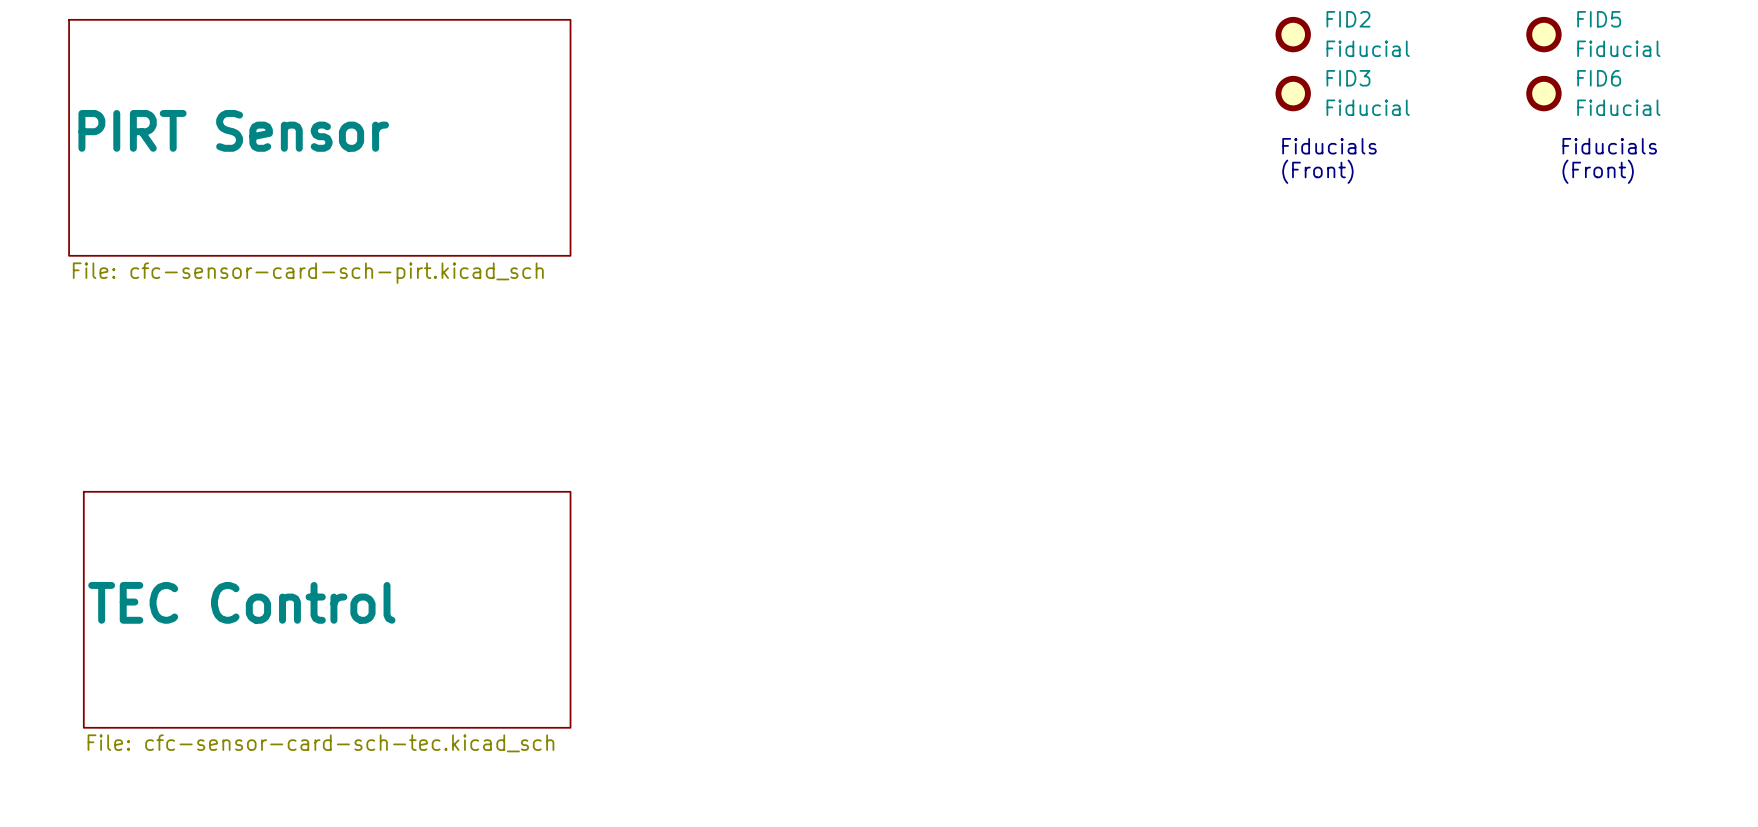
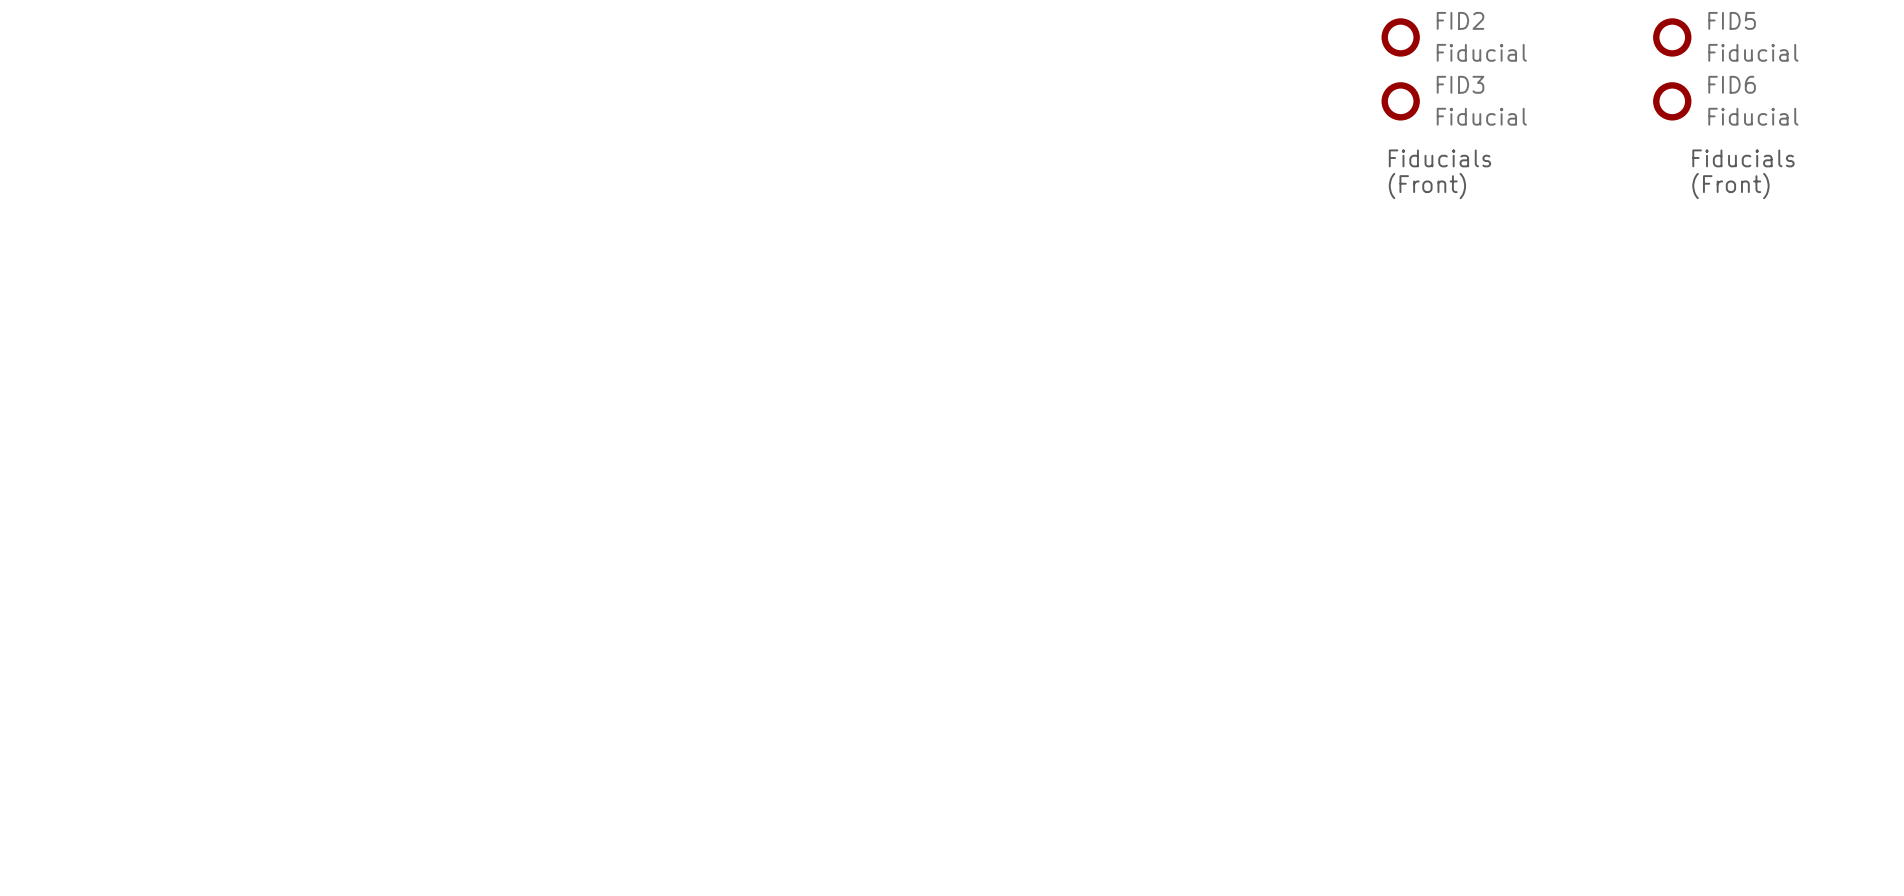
sheet PIRT Sensor: File: cfc-sensor-card-sch-pirt.kicad_sch (319, 137) -> none
sheet TEC Control: File: cfc-sensor-card-sch-tec.kicad_sch (327, 609) -> none

